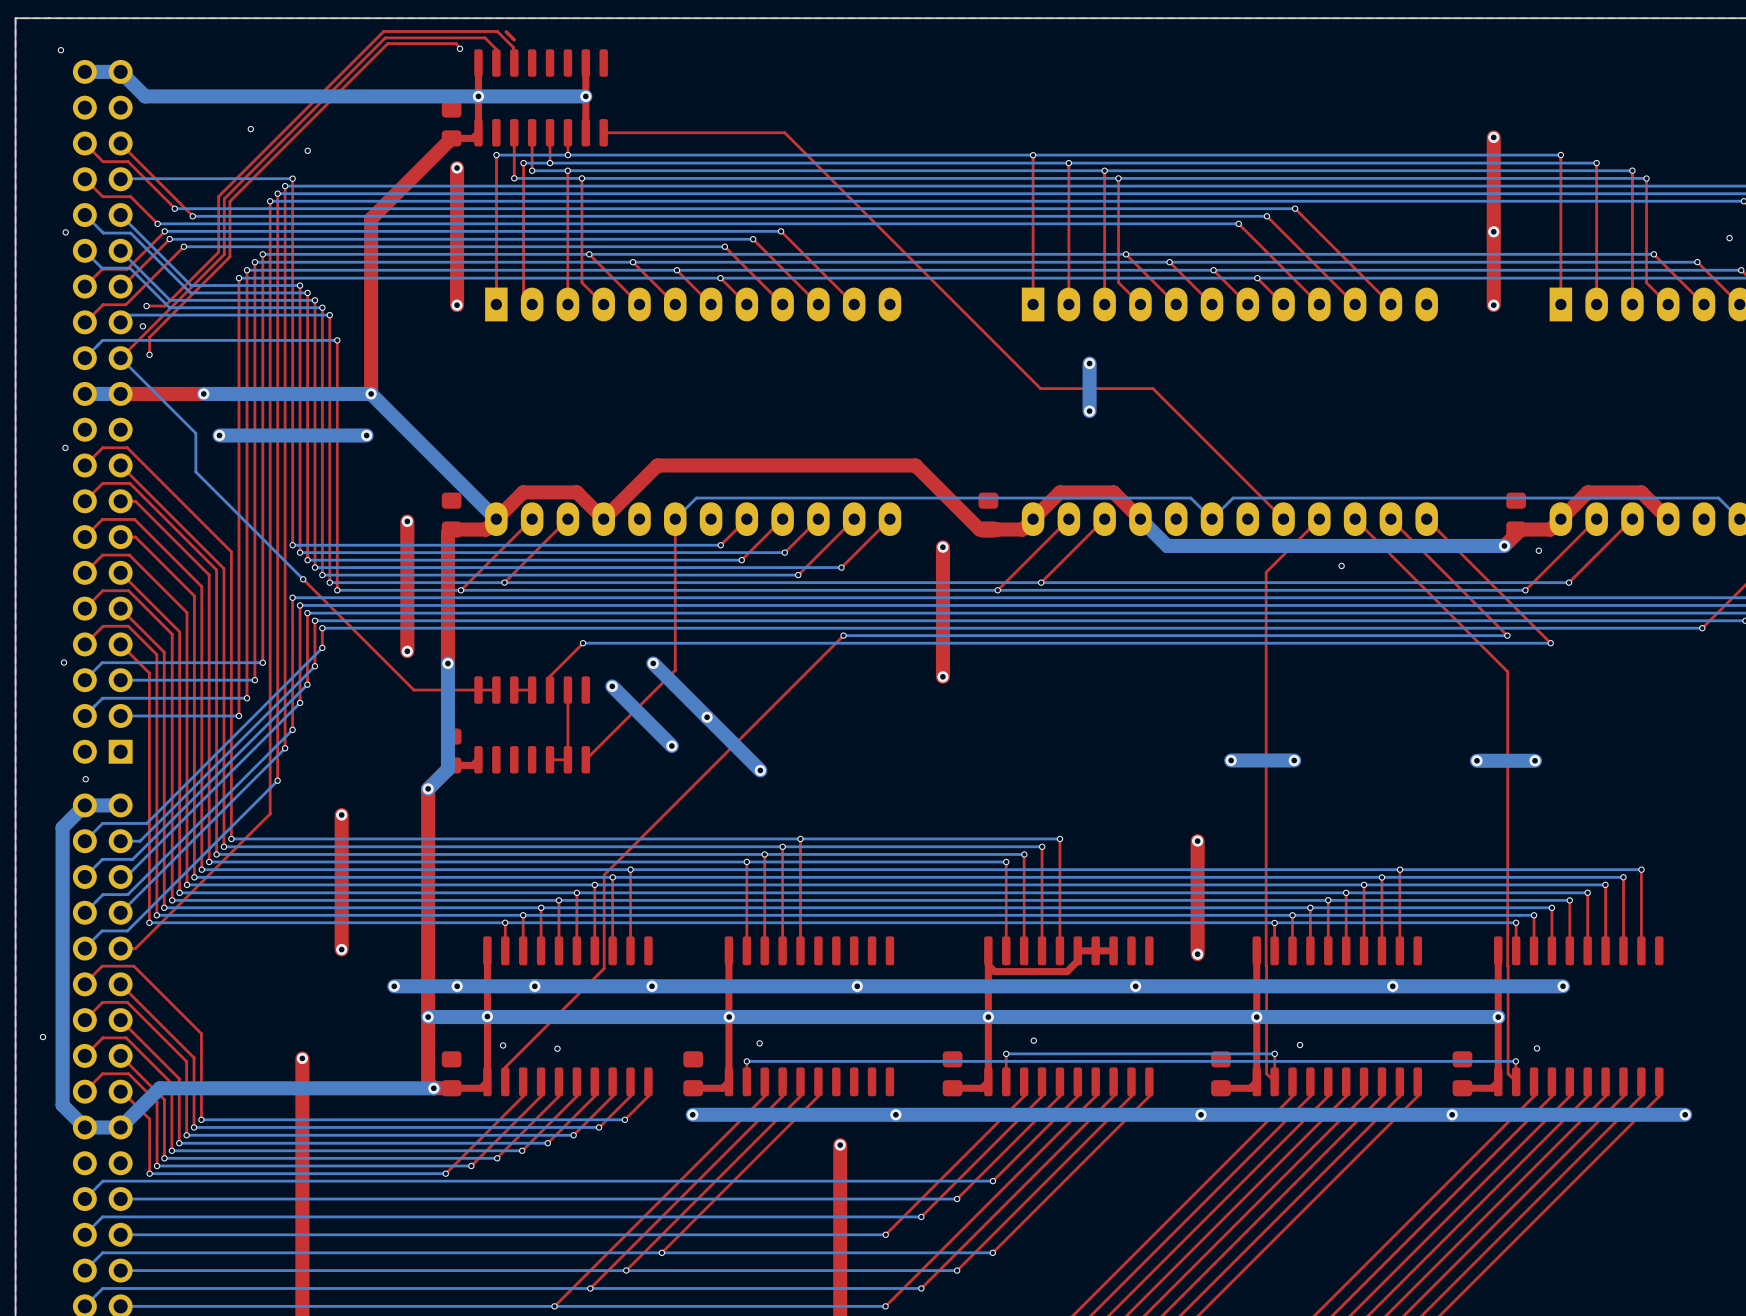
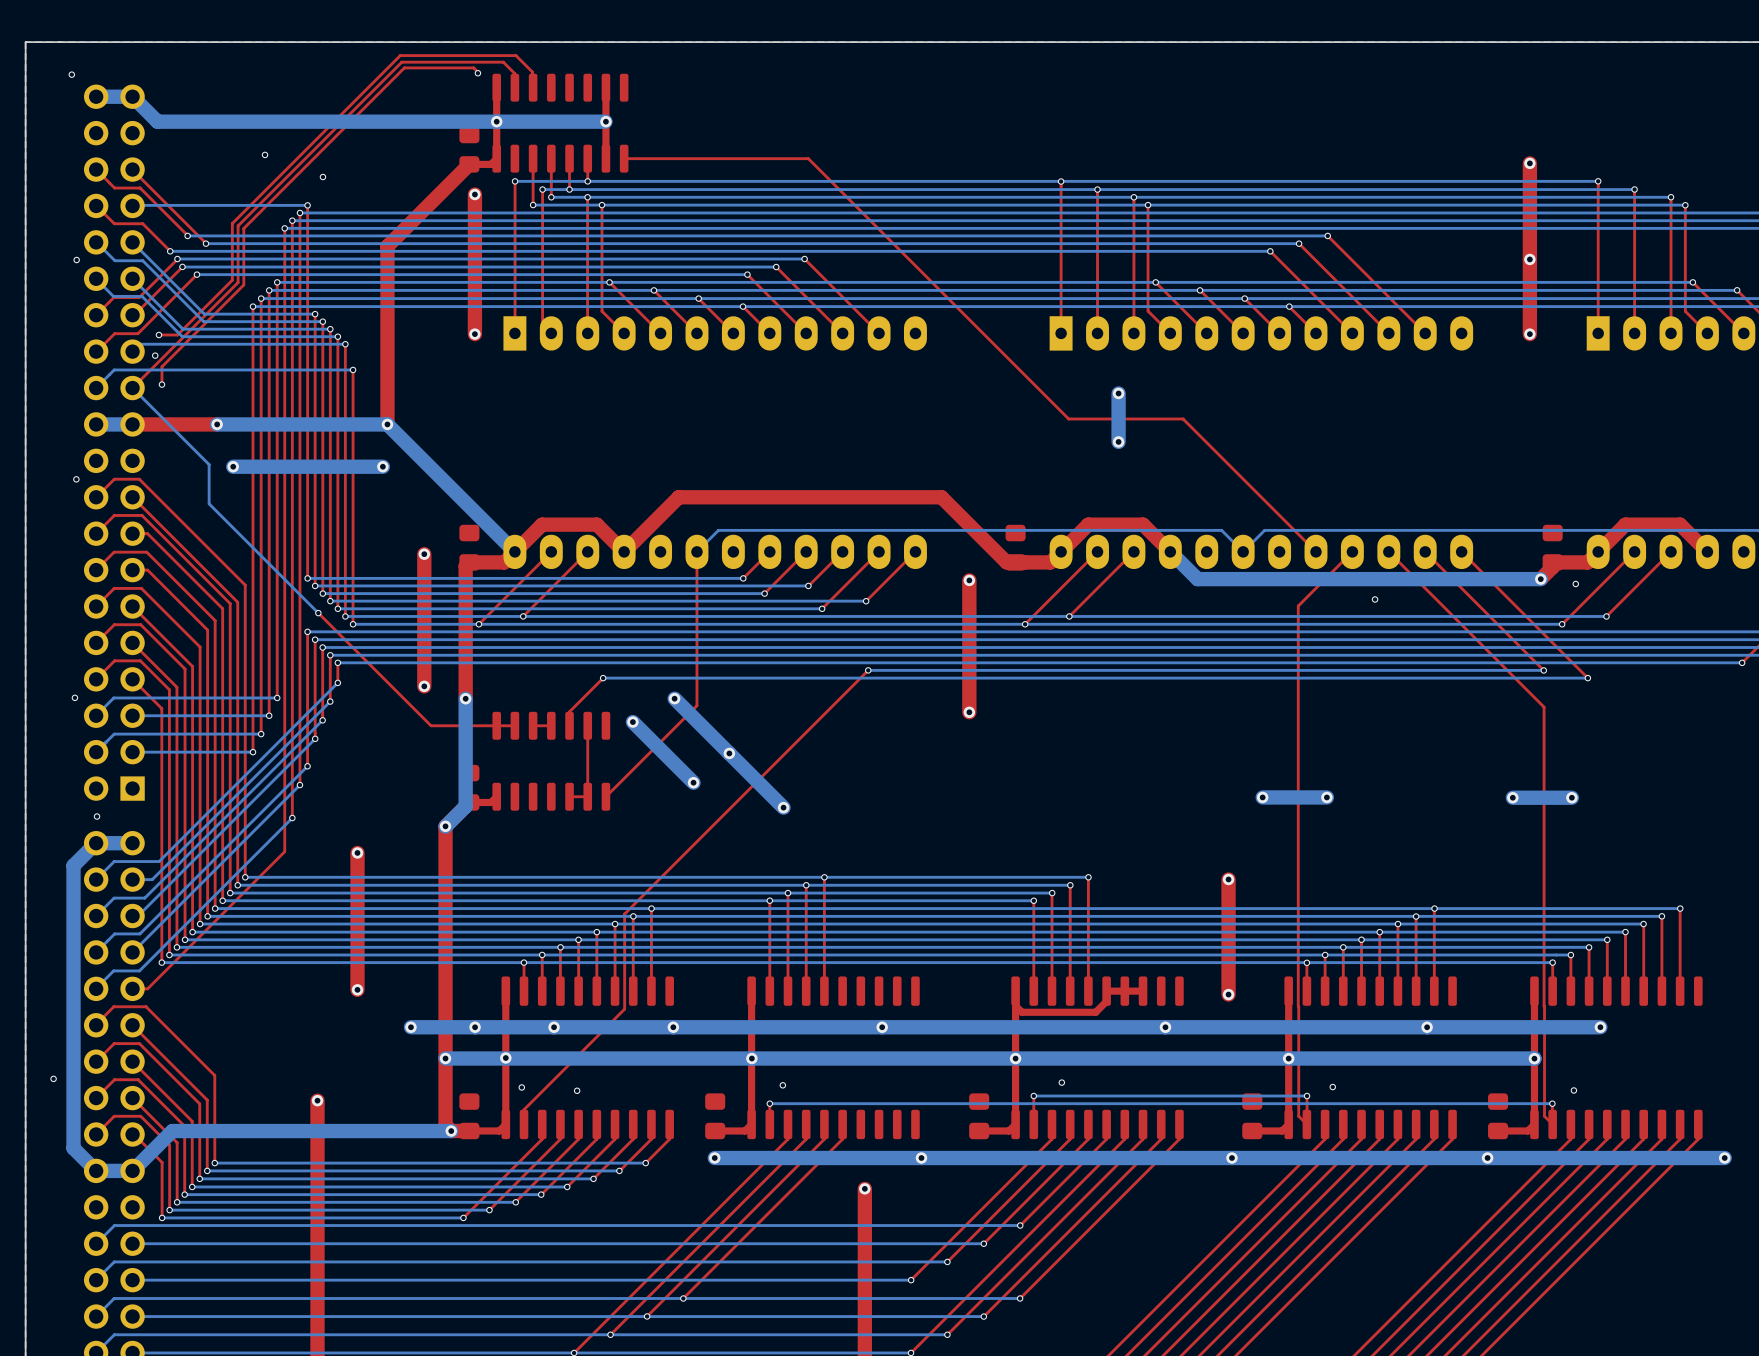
top track: (506, 31) (514, 39) -> none

